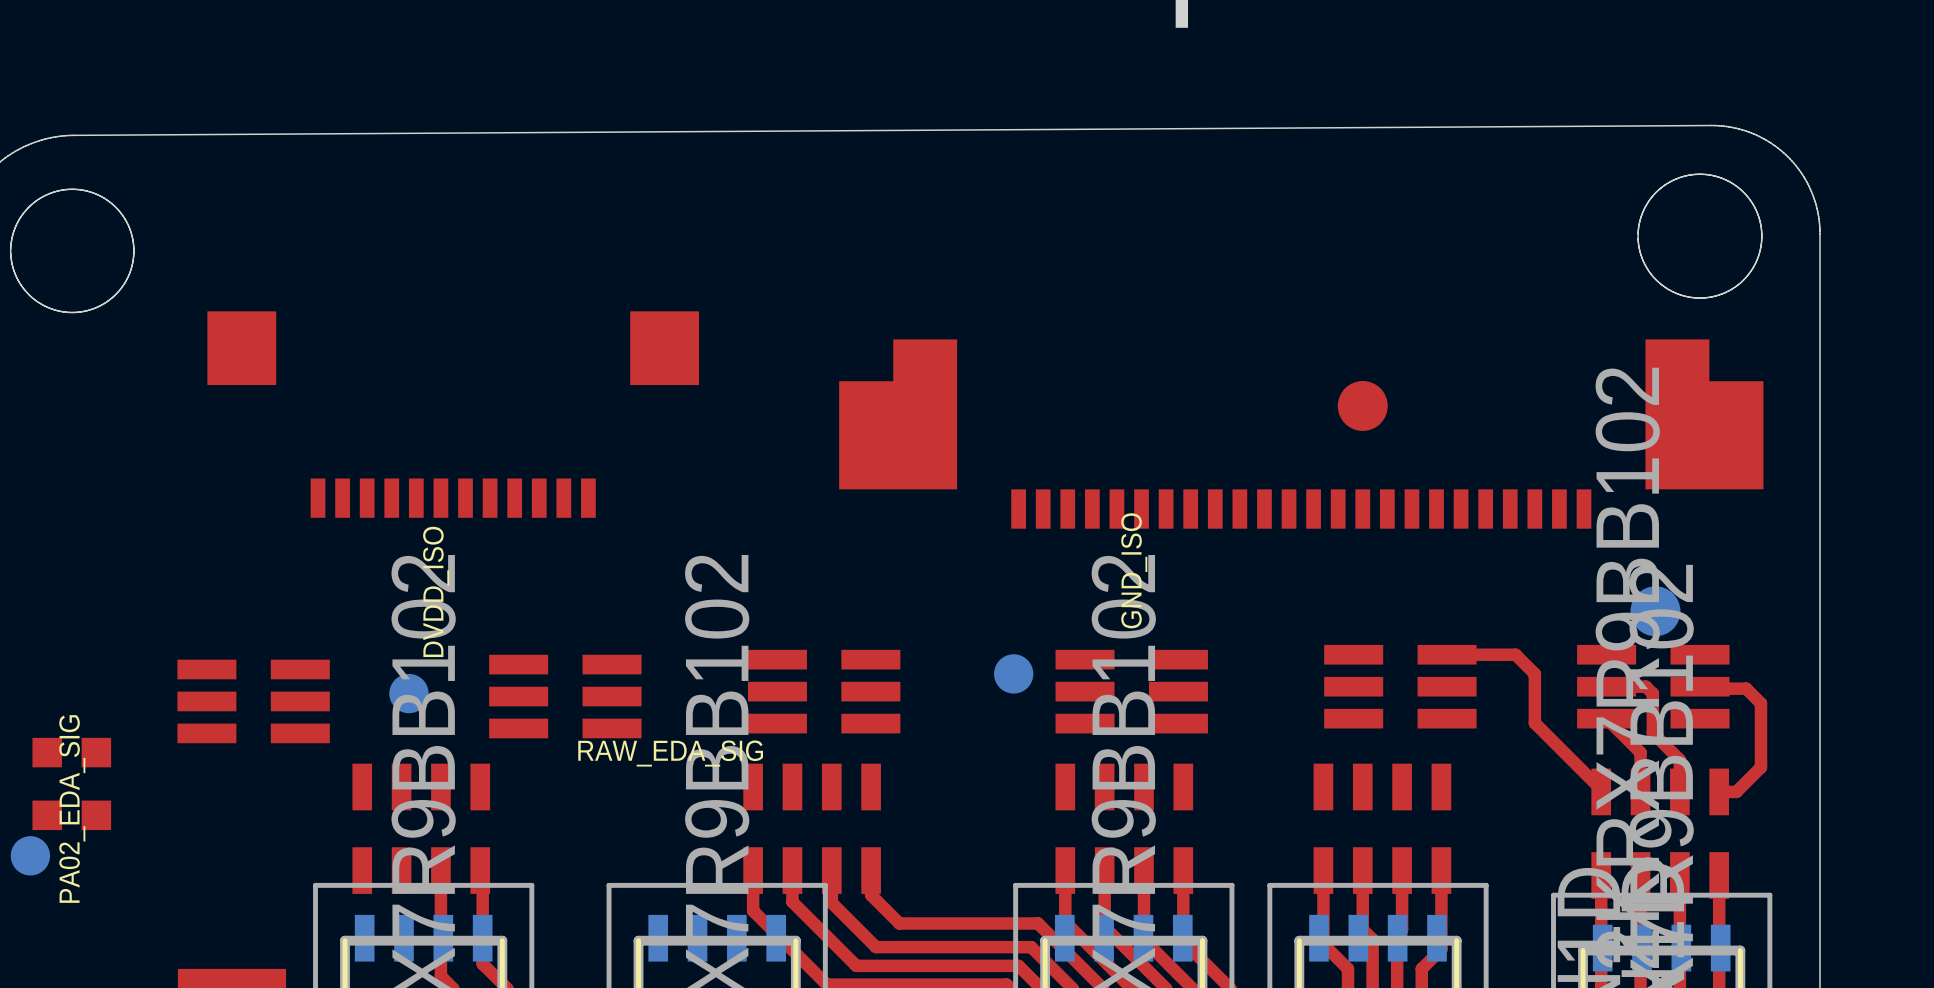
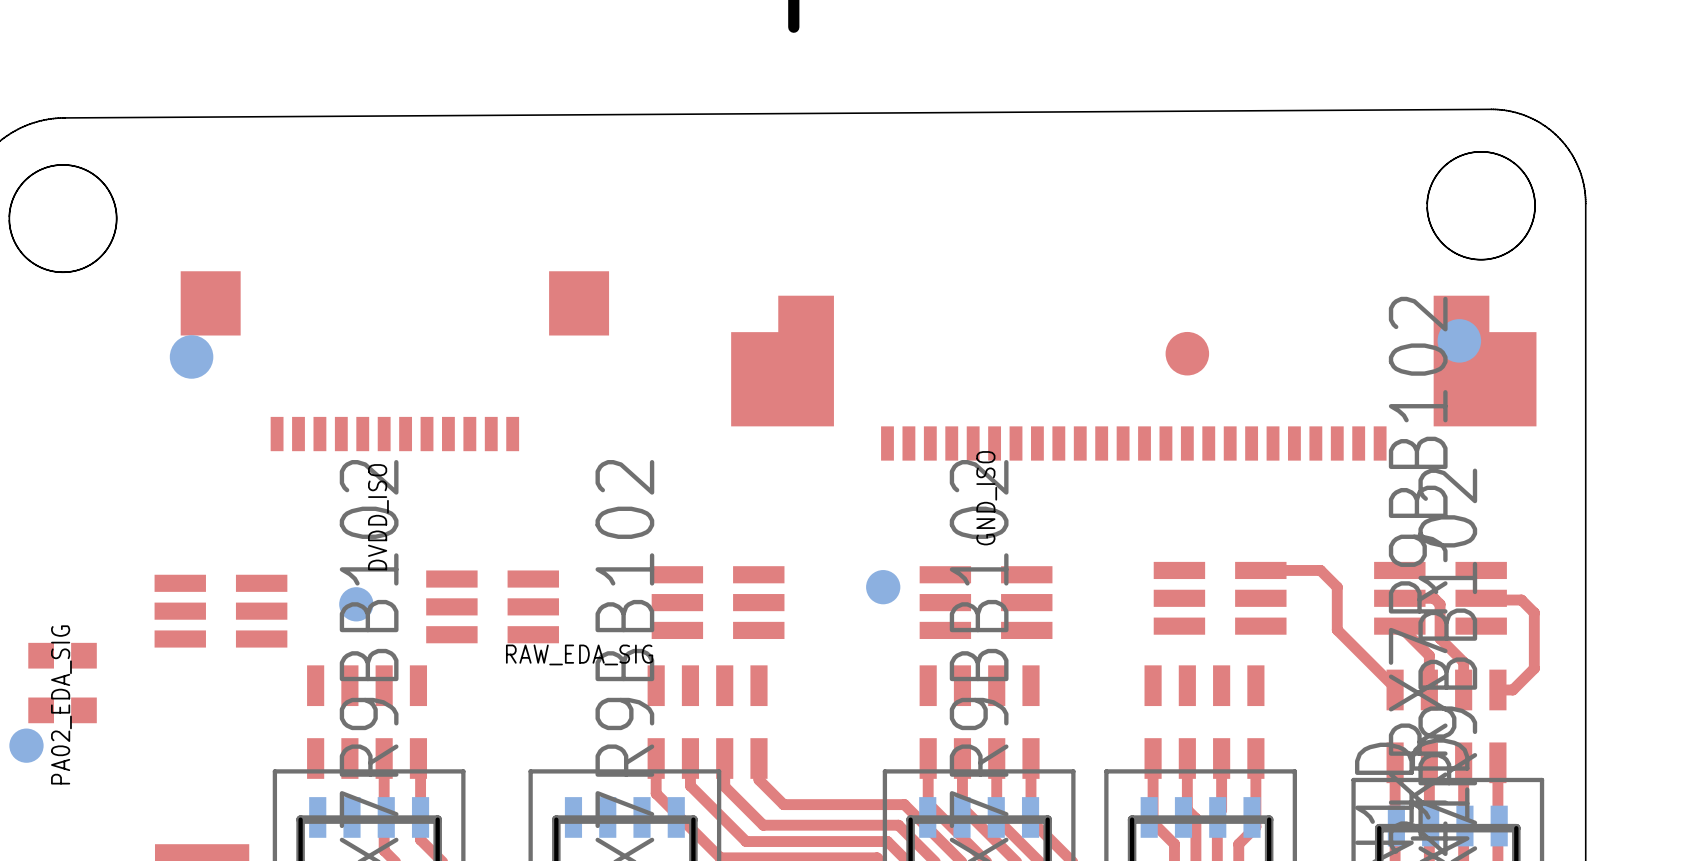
part: none -> (191, 356)
part position: (1655, 611) -> (1459, 340)

